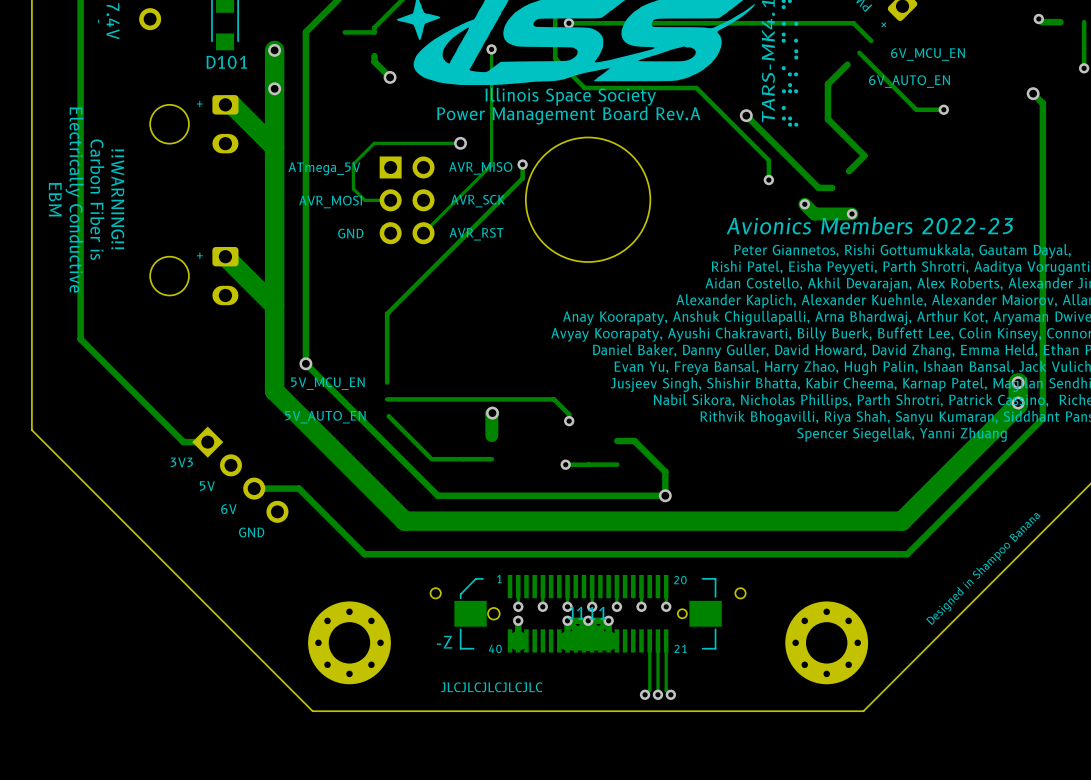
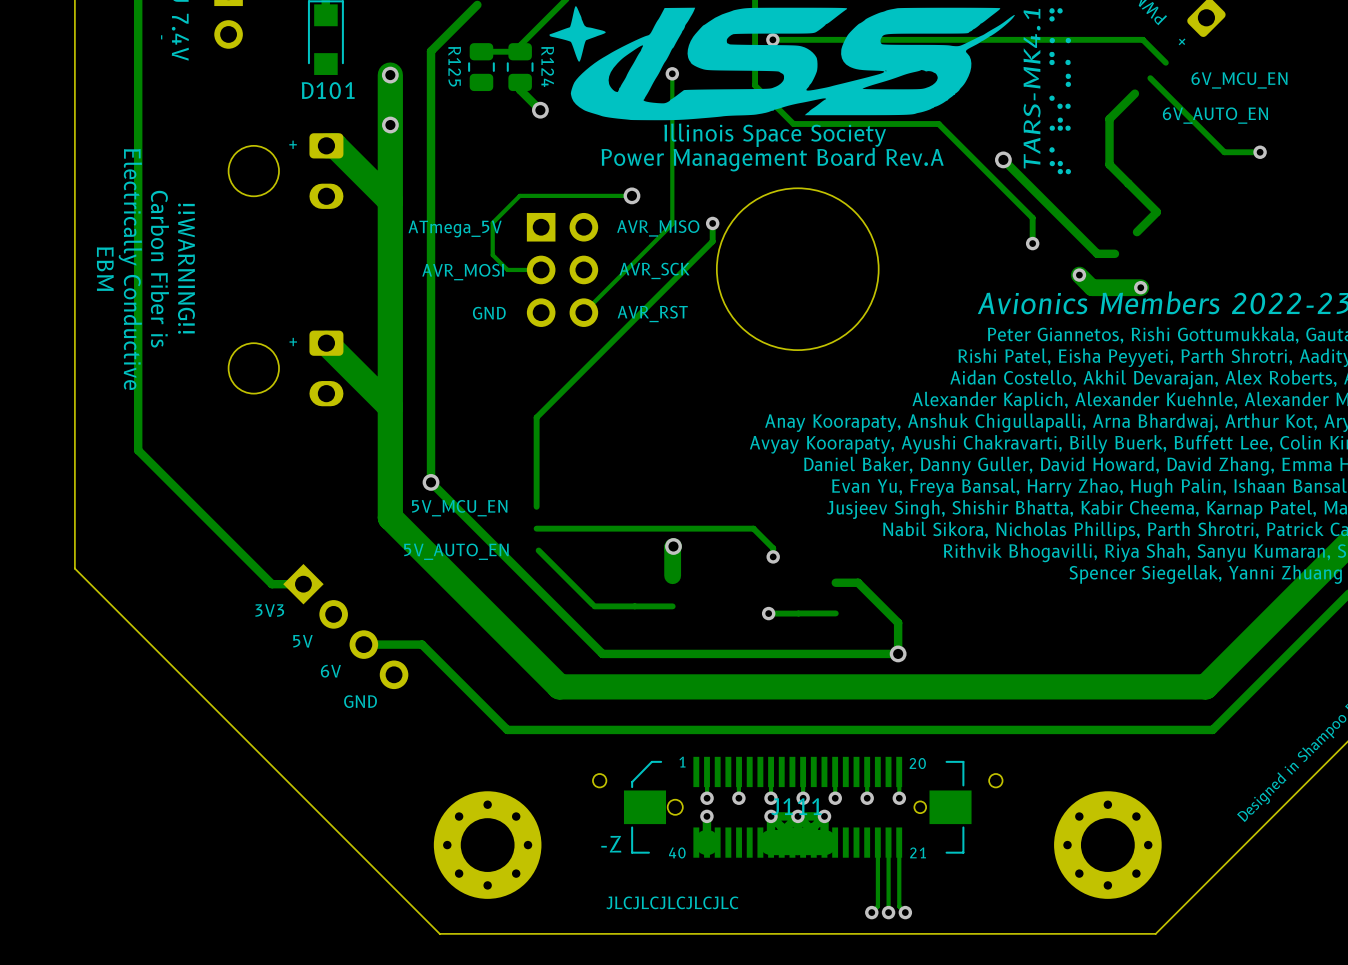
R125: none -> (481, 67)
R124: none -> (520, 67)

